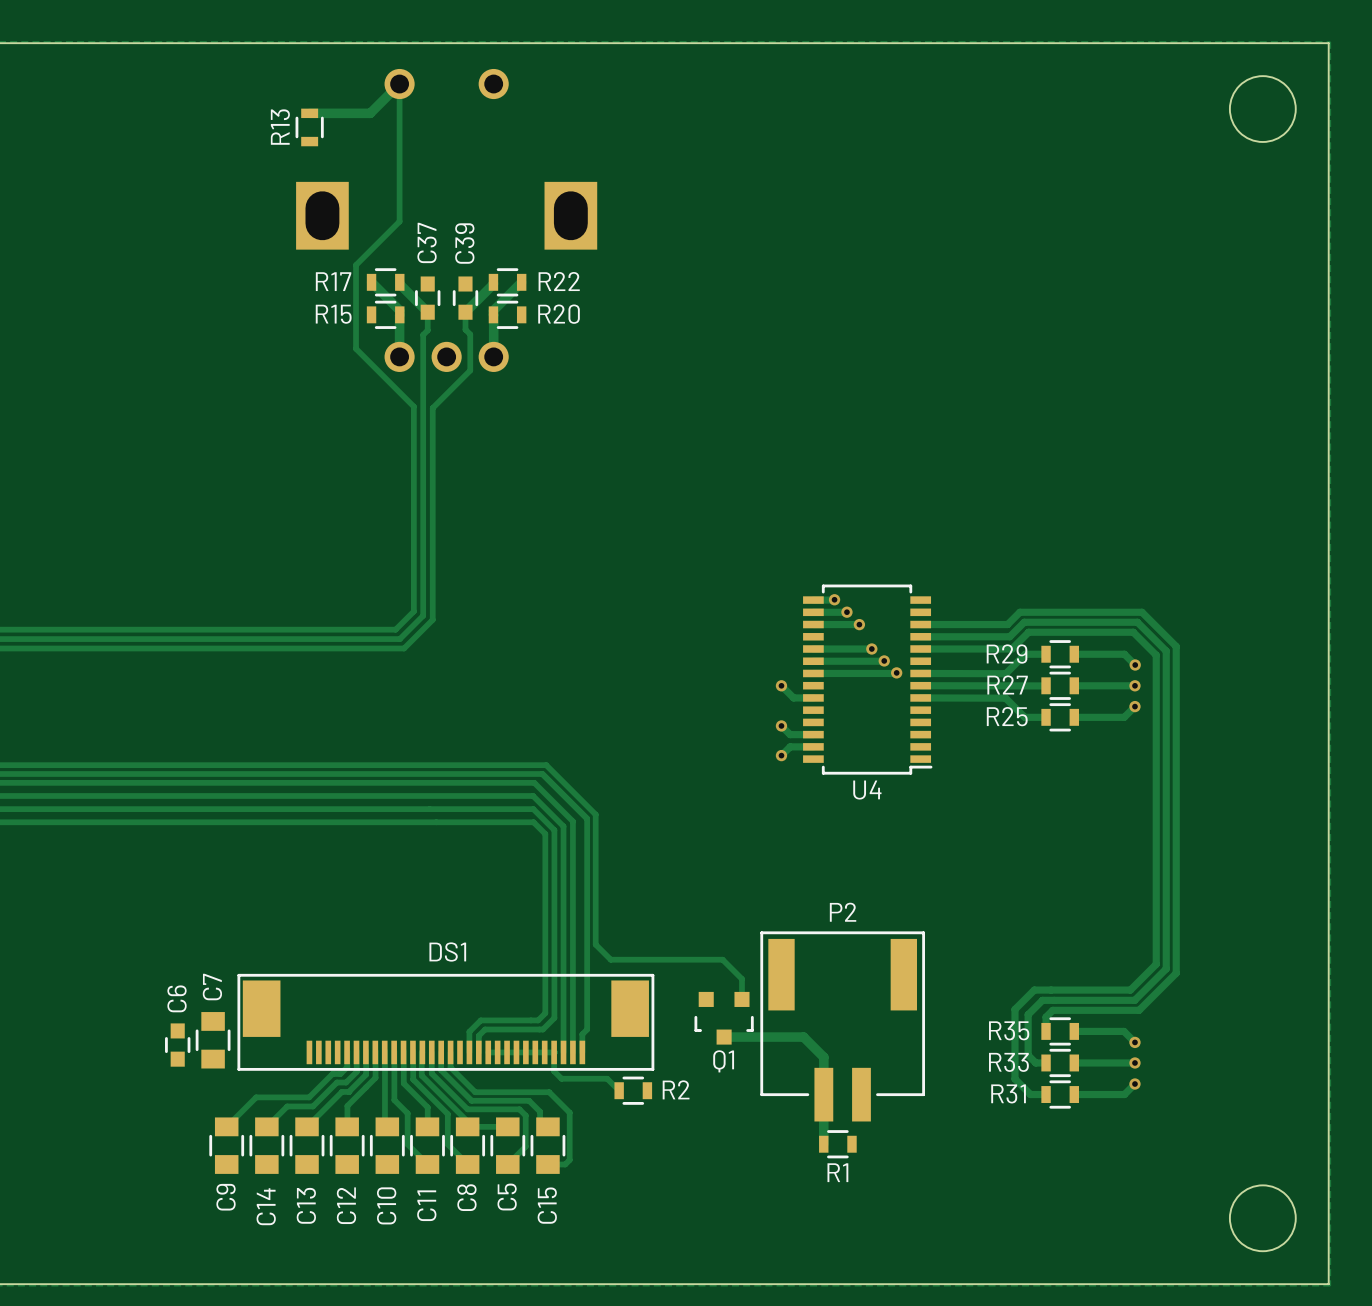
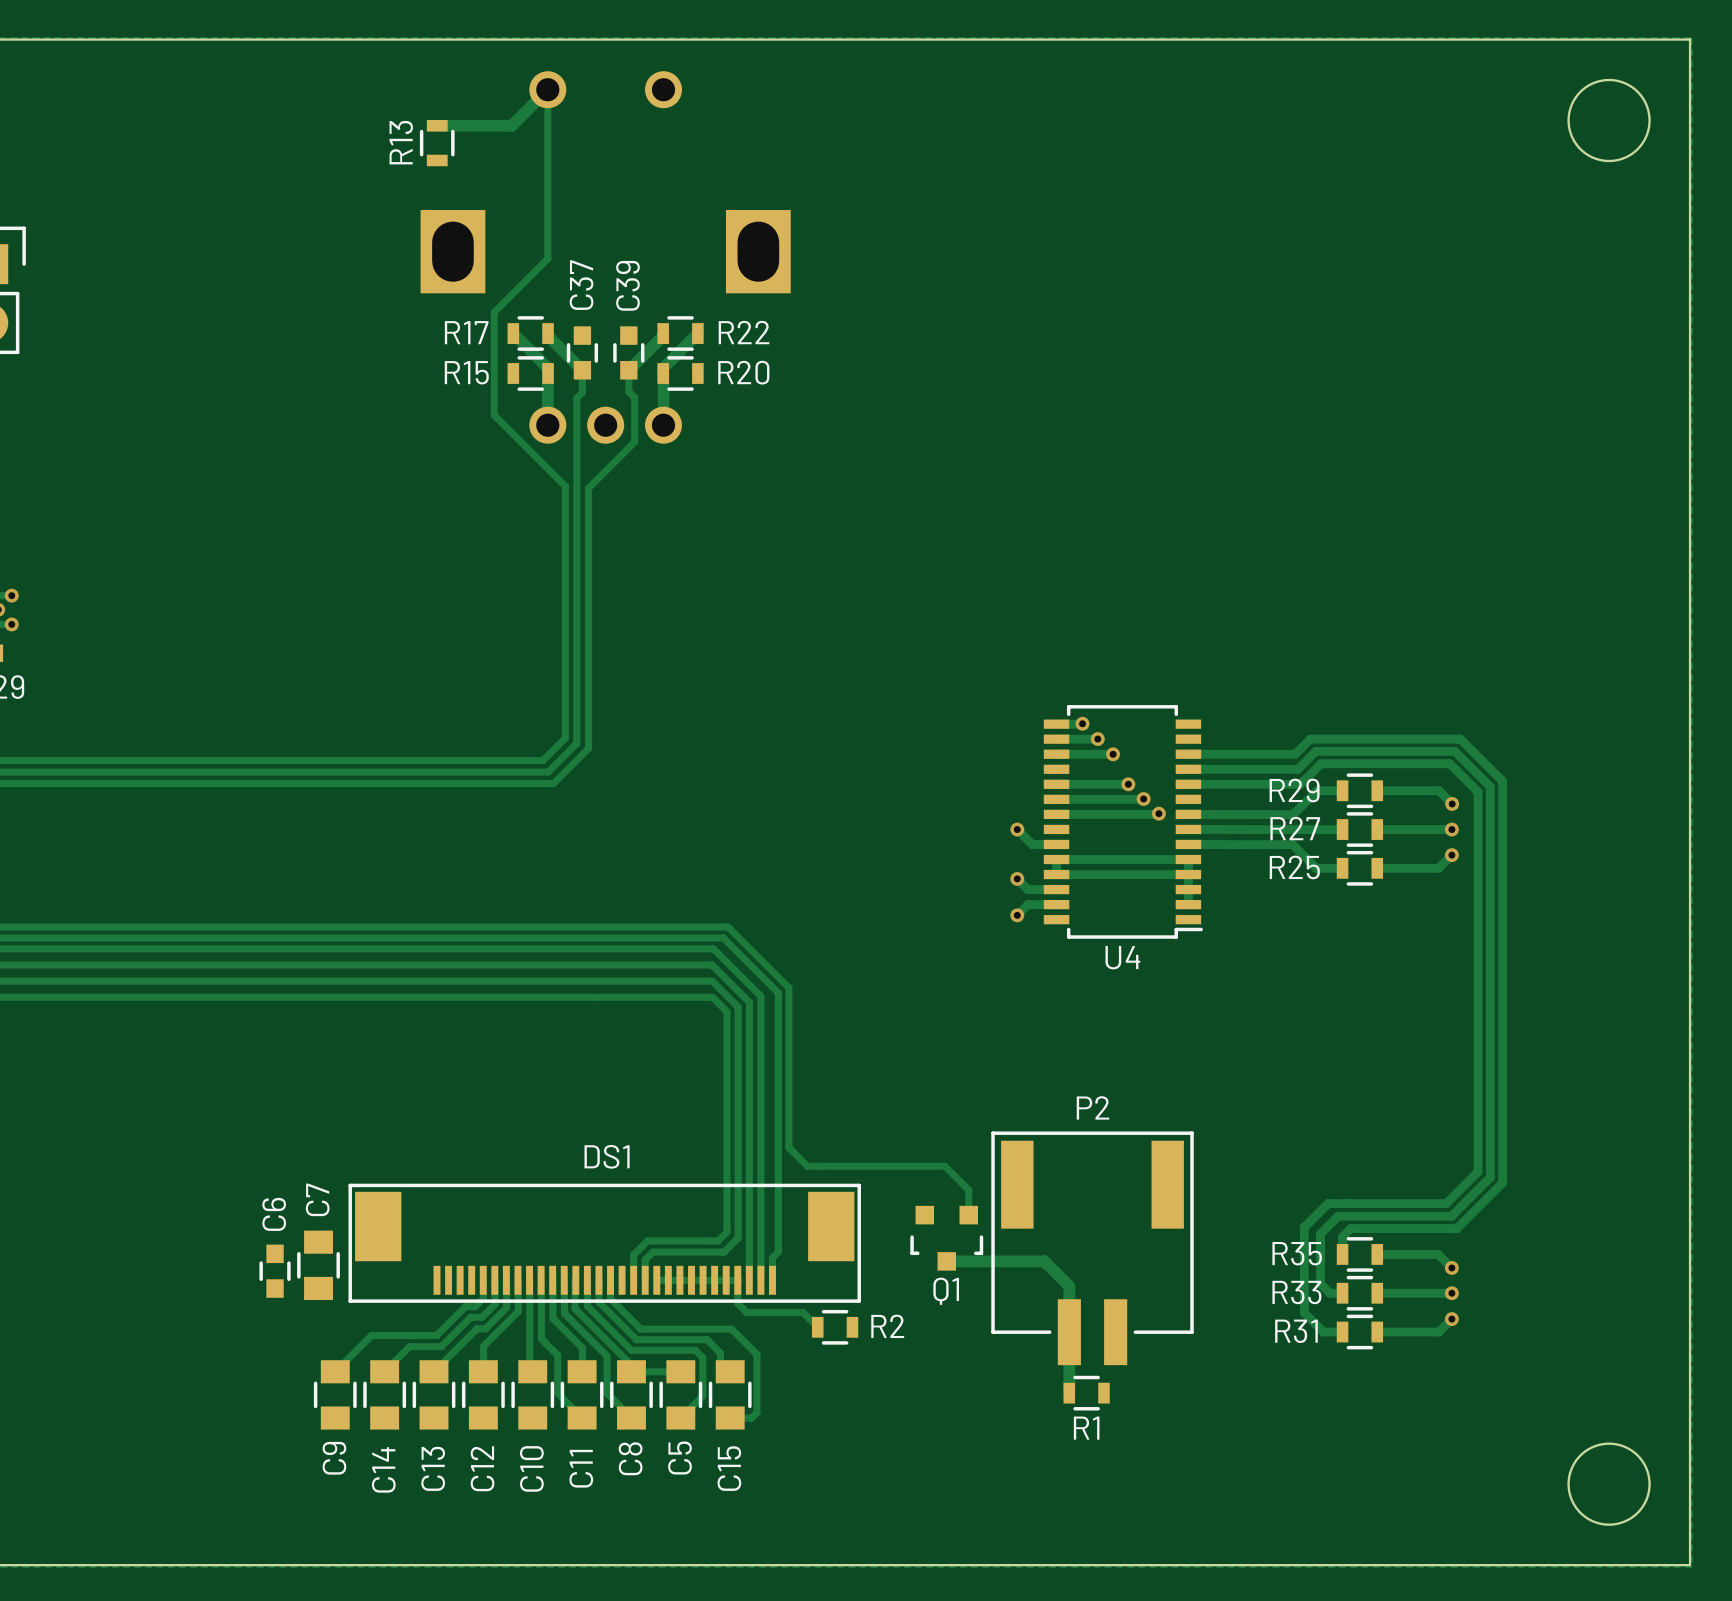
track: none -> (1188, 874) (1056, 874) (1056, 859) (1188, 859) (1188, 904)

